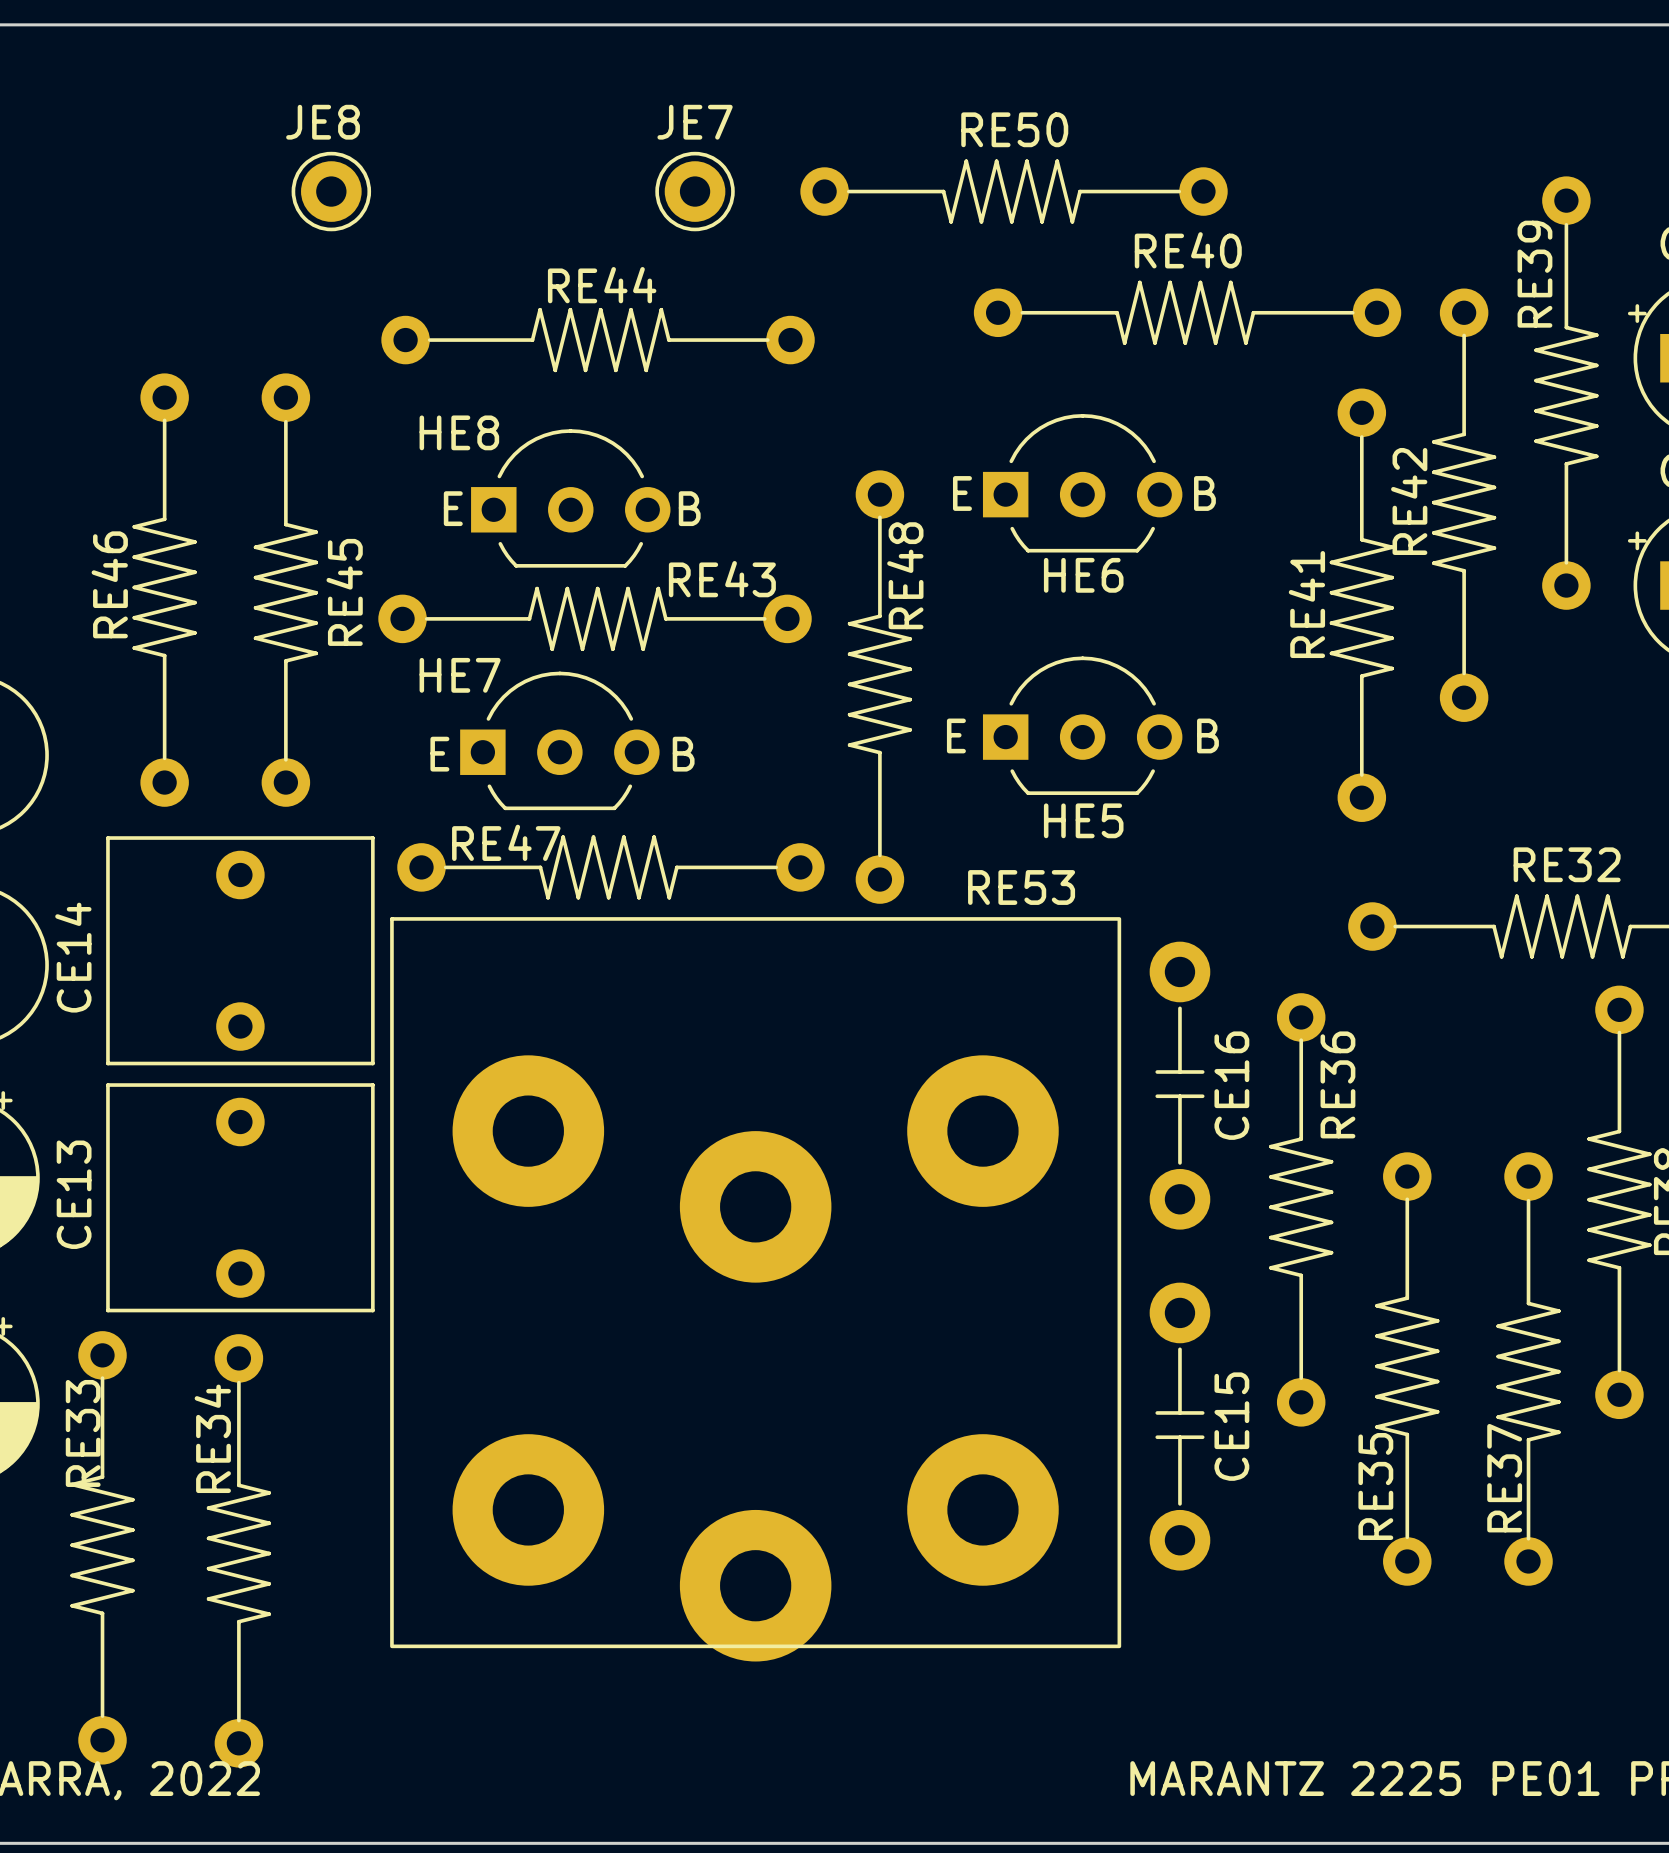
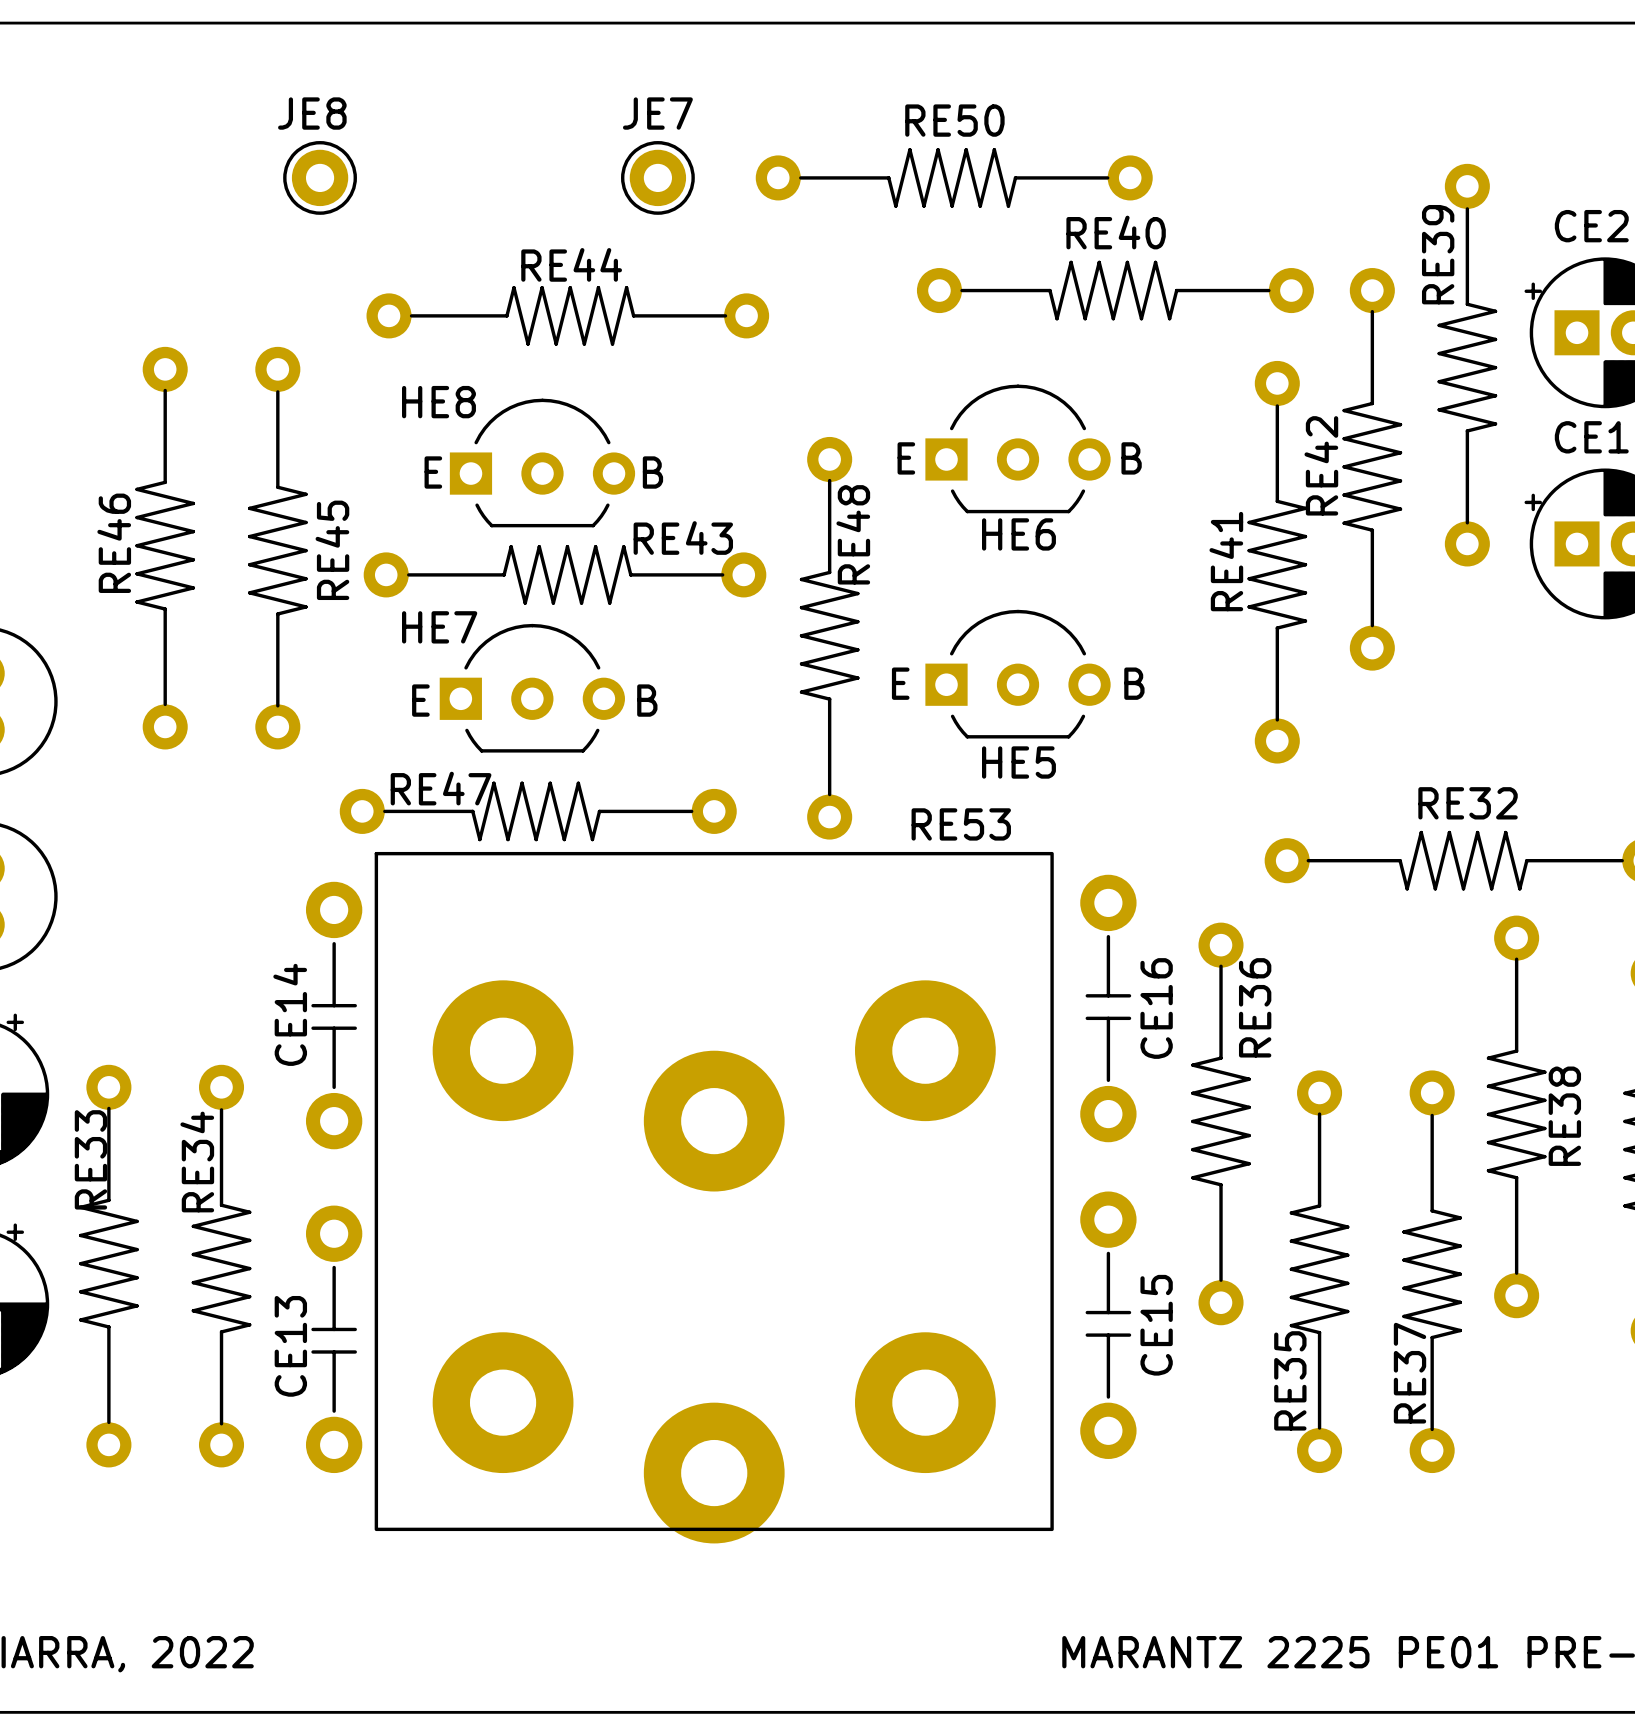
CE14 footprint: [106, 836, 375, 1066] -> [305, 881, 363, 1150]
RE47 position: (610, 867) -> (538, 811)
CE14 name position: CE14 (73, 957) -> CE14 (290, 1014)
CE13 footprint: [106, 1083, 375, 1313] -> [305, 1205, 363, 1474]
CE13 name position: CE13 (74, 1194) -> CE13 (290, 1346)
RE33 position: (102, 1547) -> (108, 1266)
RE34 position: (238, 1550) -> (221, 1266)

